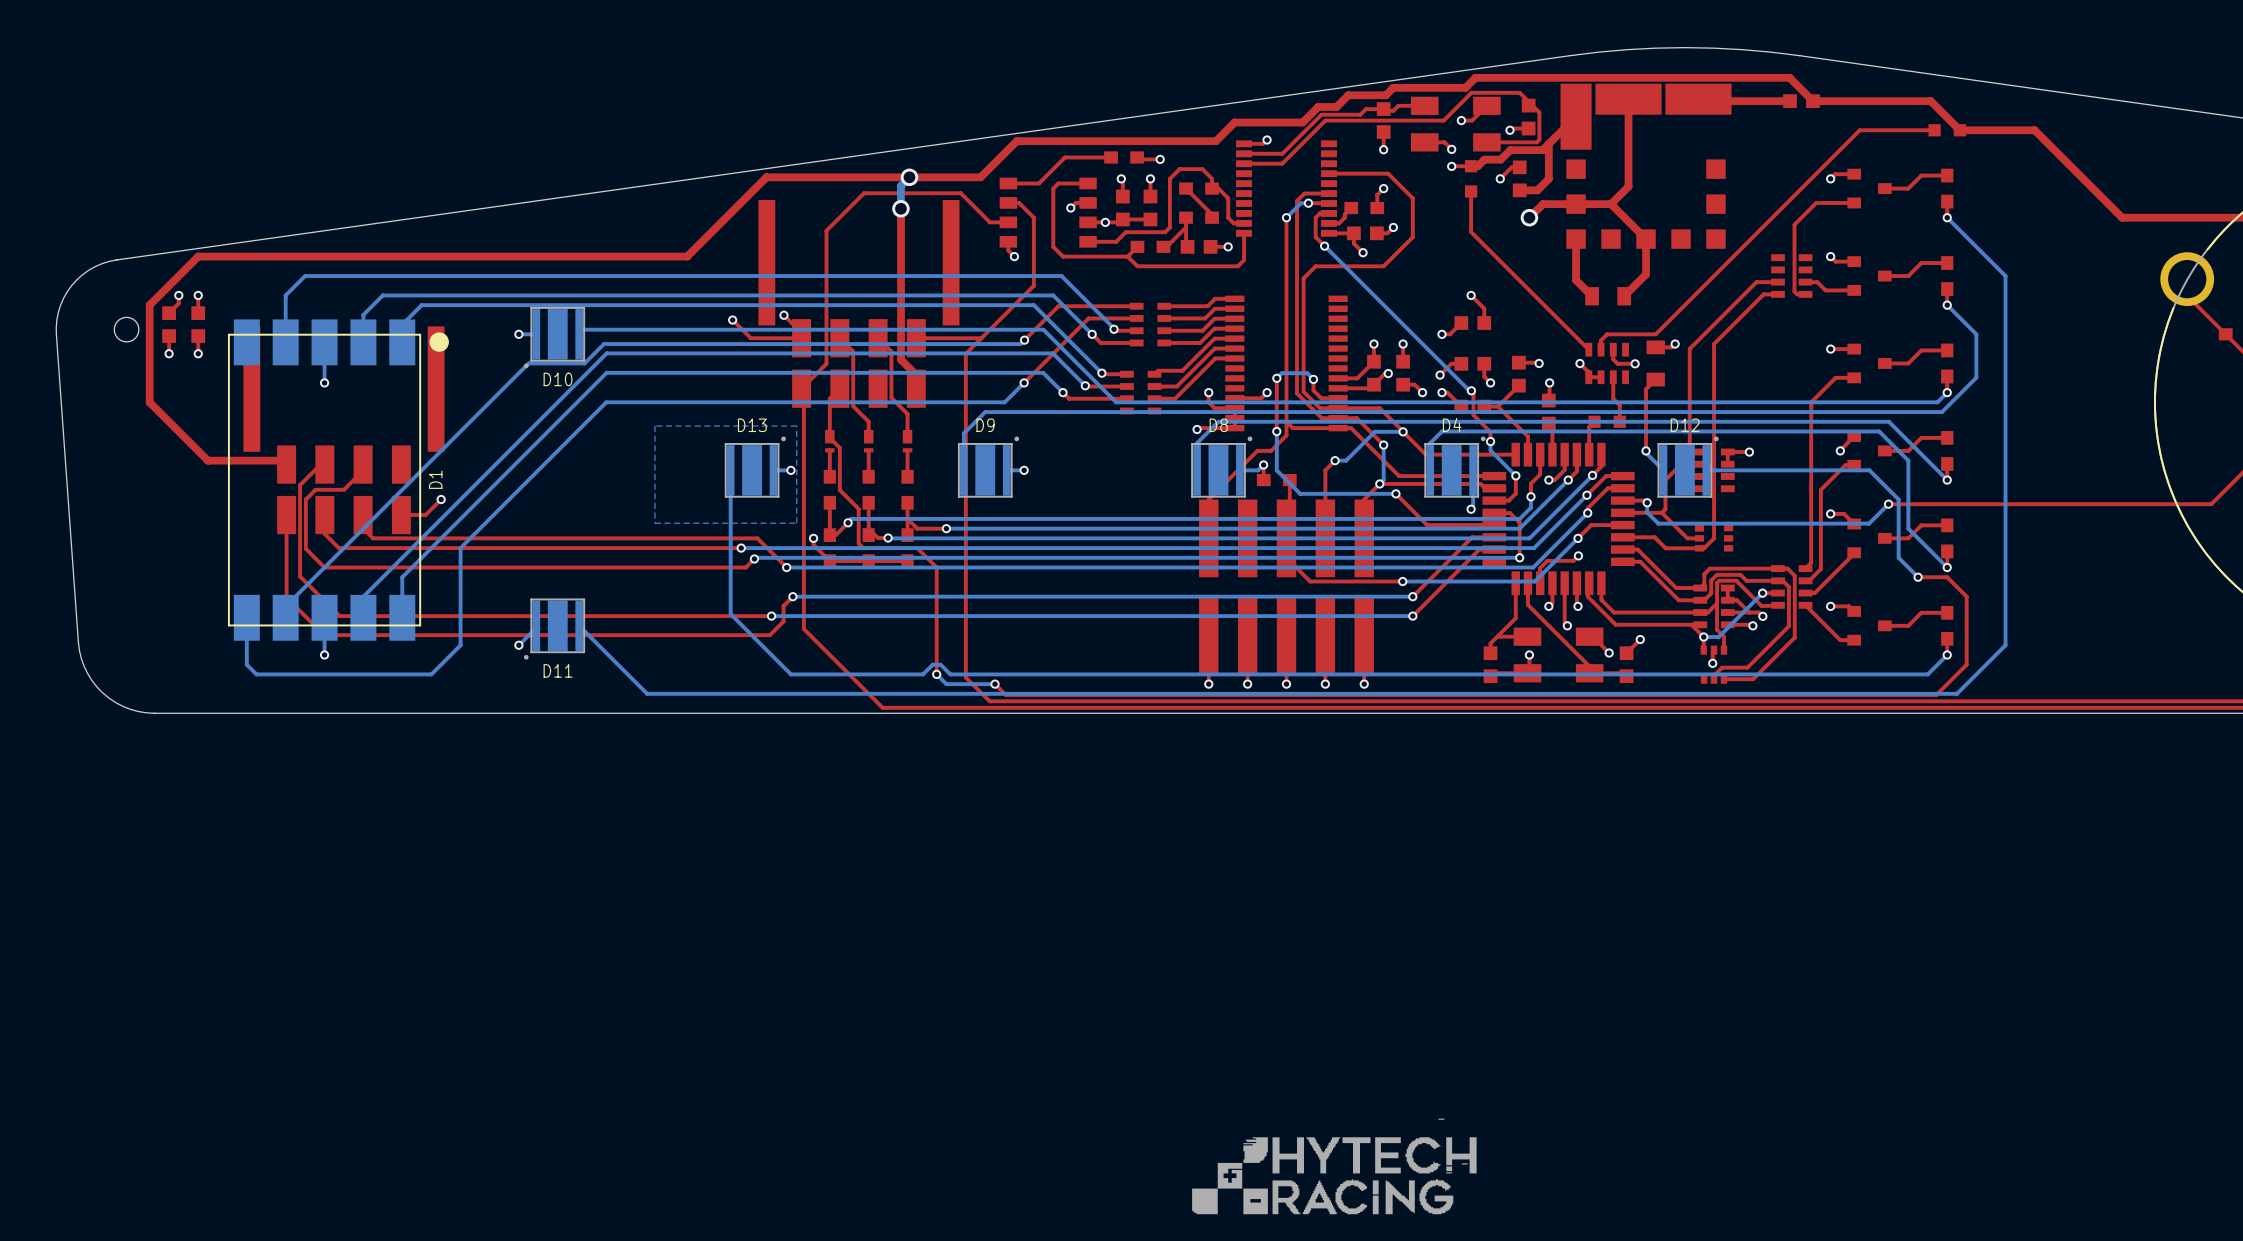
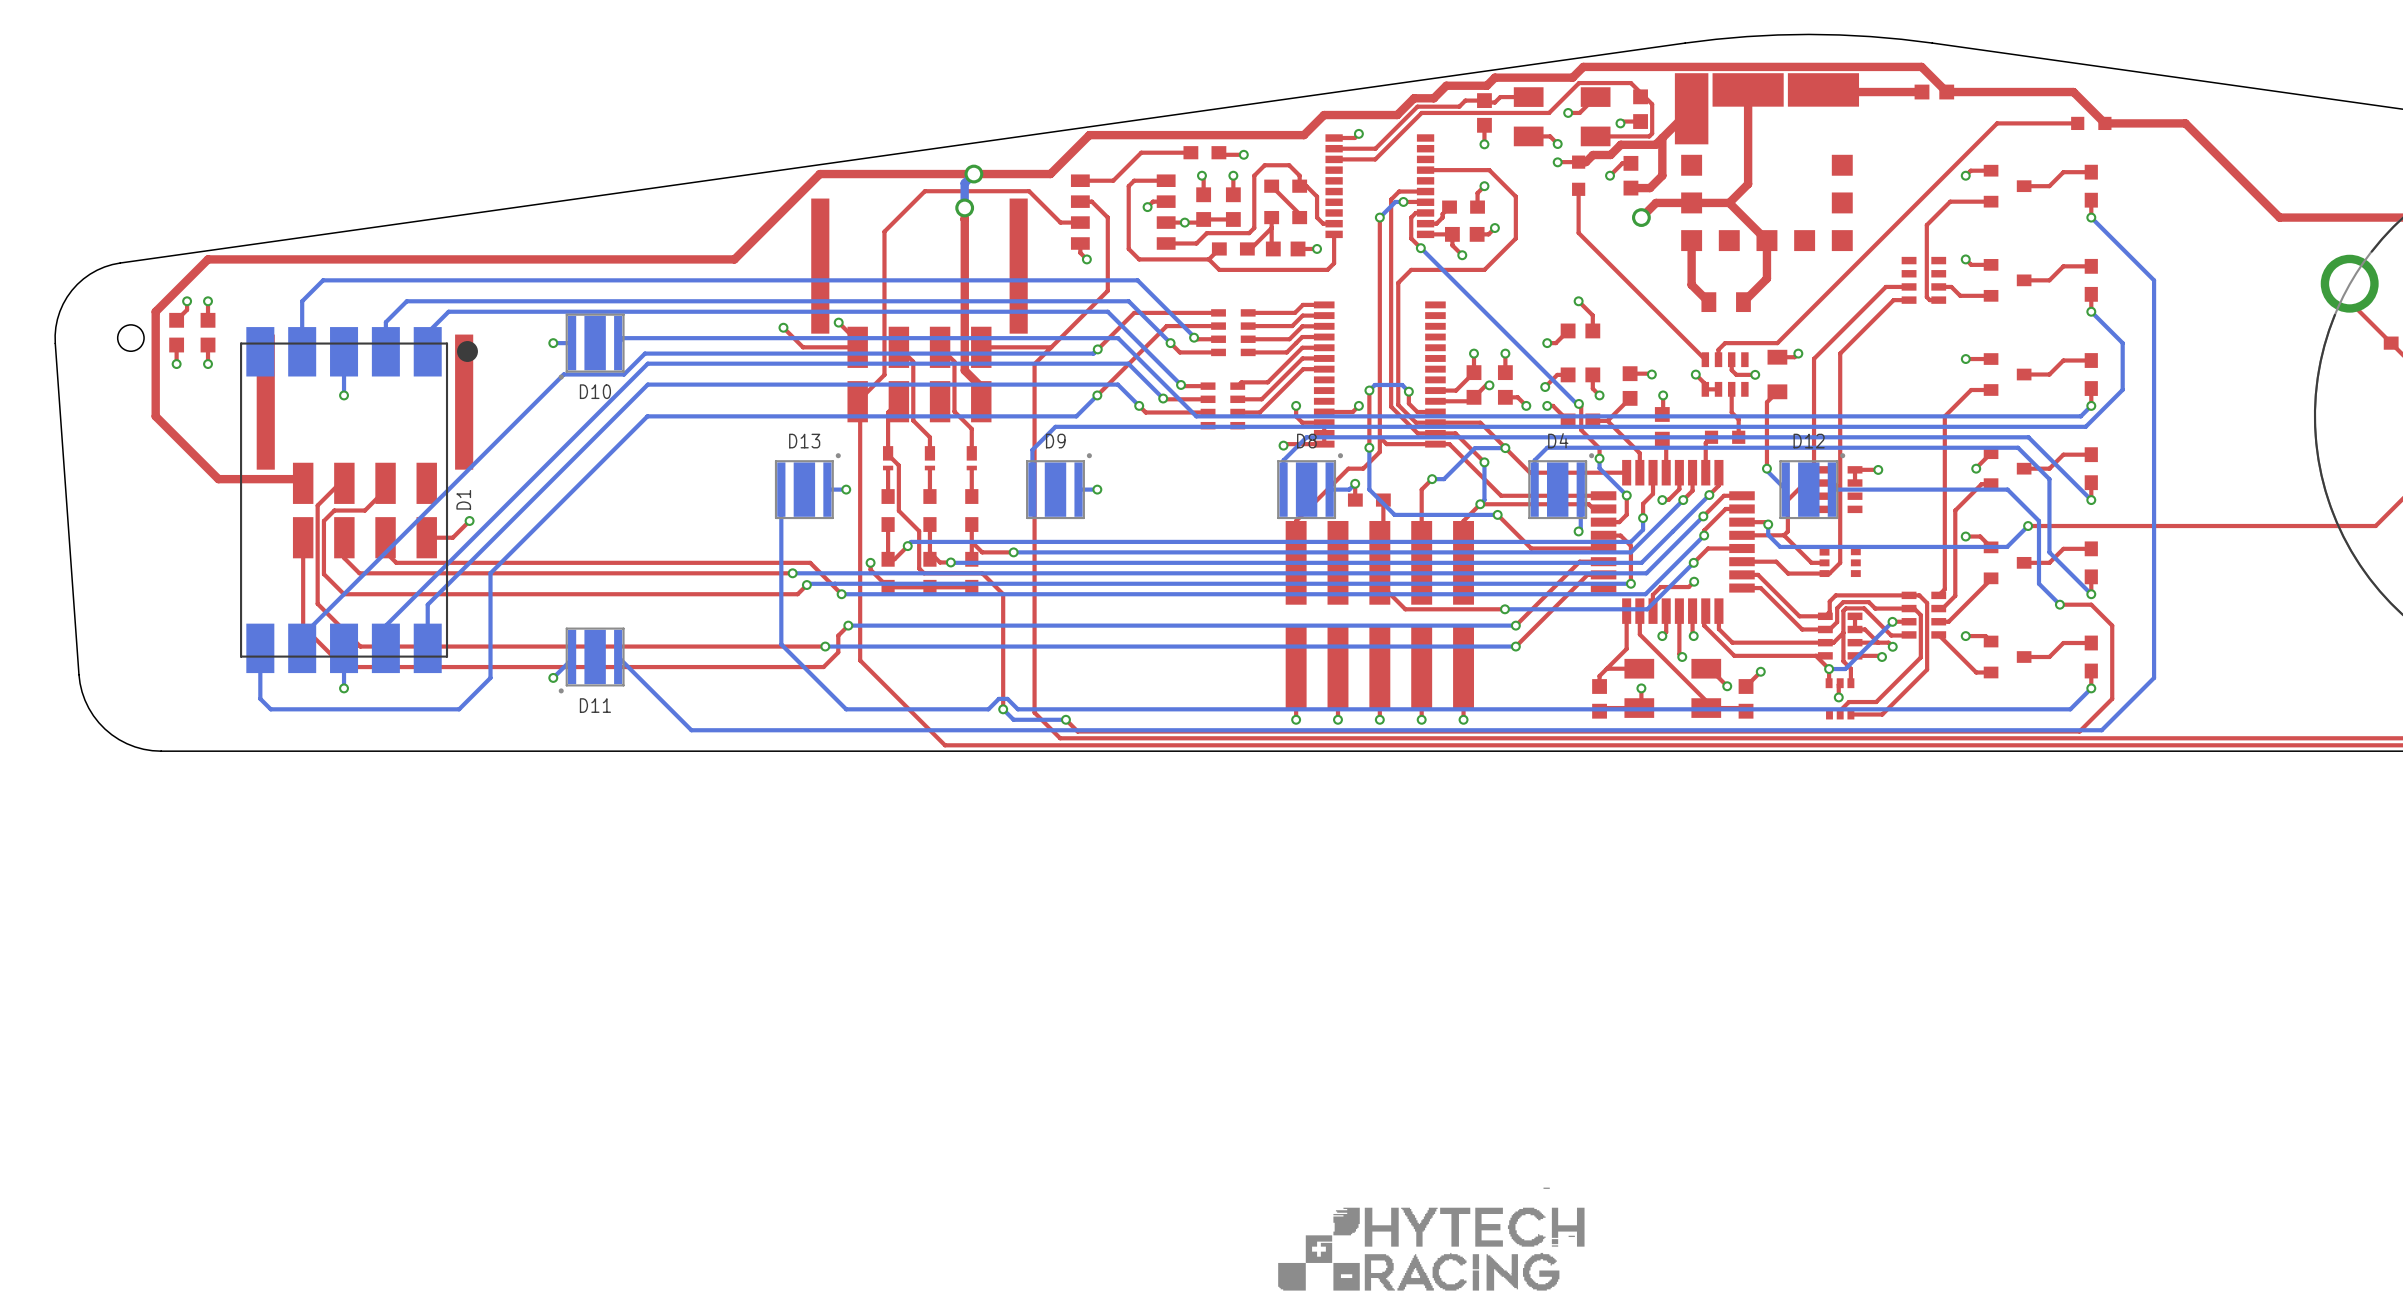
bottom zone outline: (796, 426) (796, 523) (654, 523) (654, 426) (796, 426) -> none

